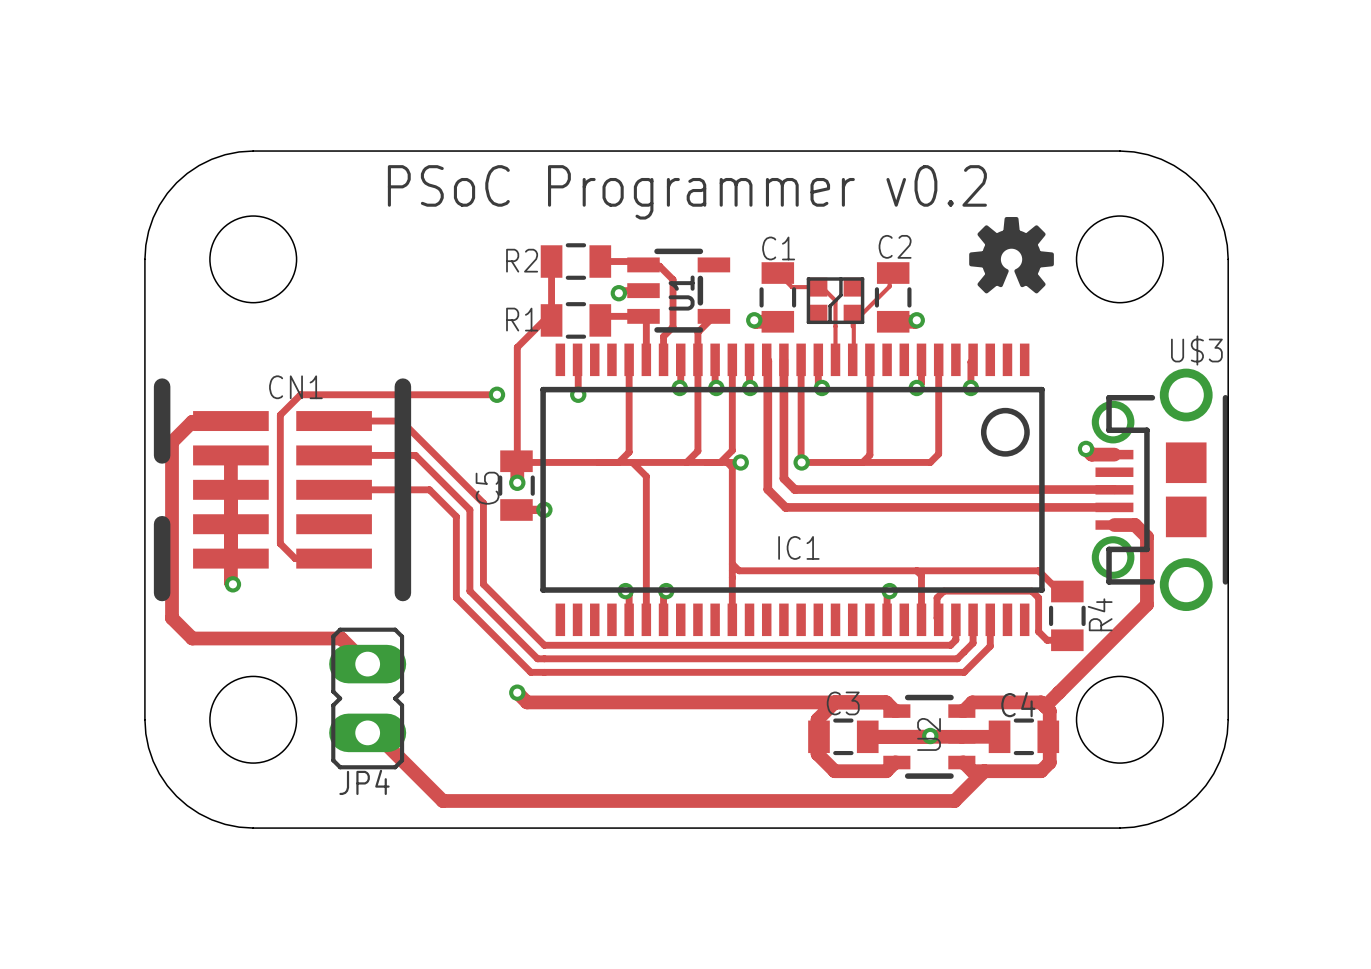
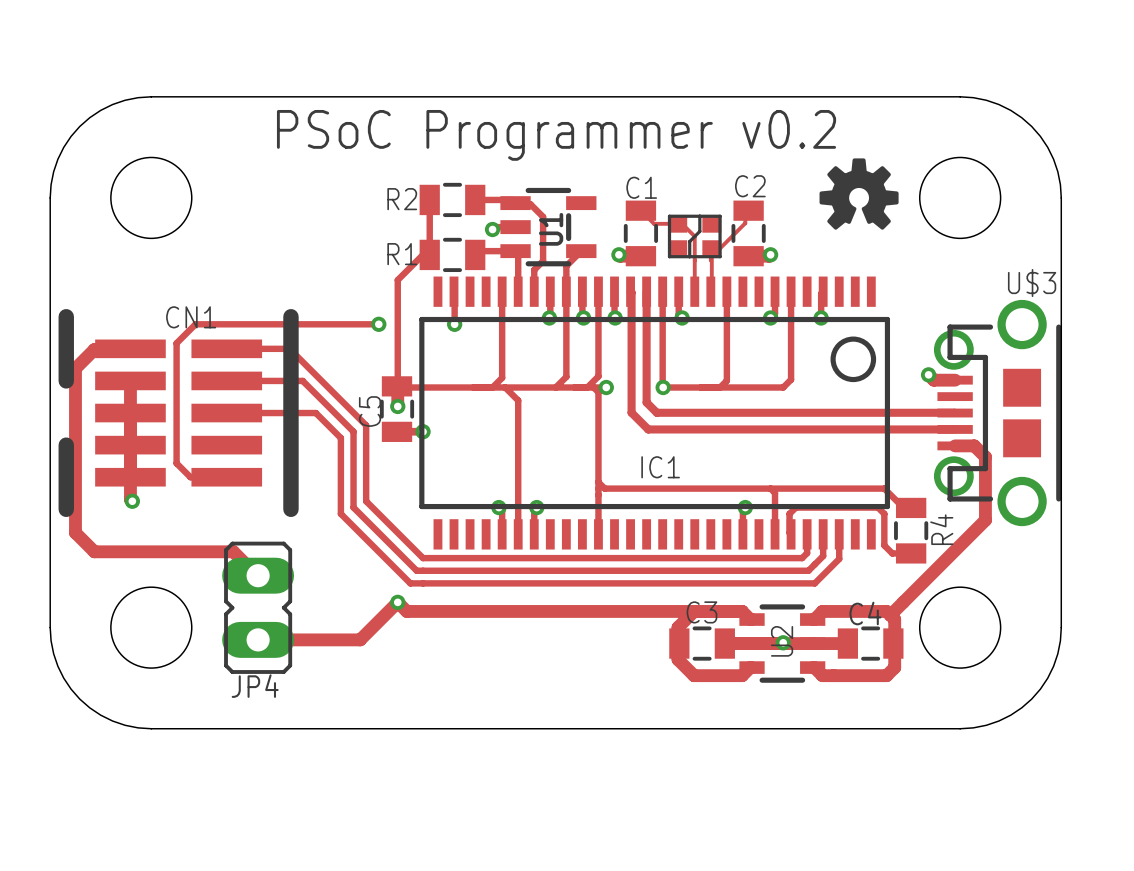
track: (374, 732) (442, 800) (954, 800) (984, 771) -> (264, 639) (360, 639) (397, 602)

